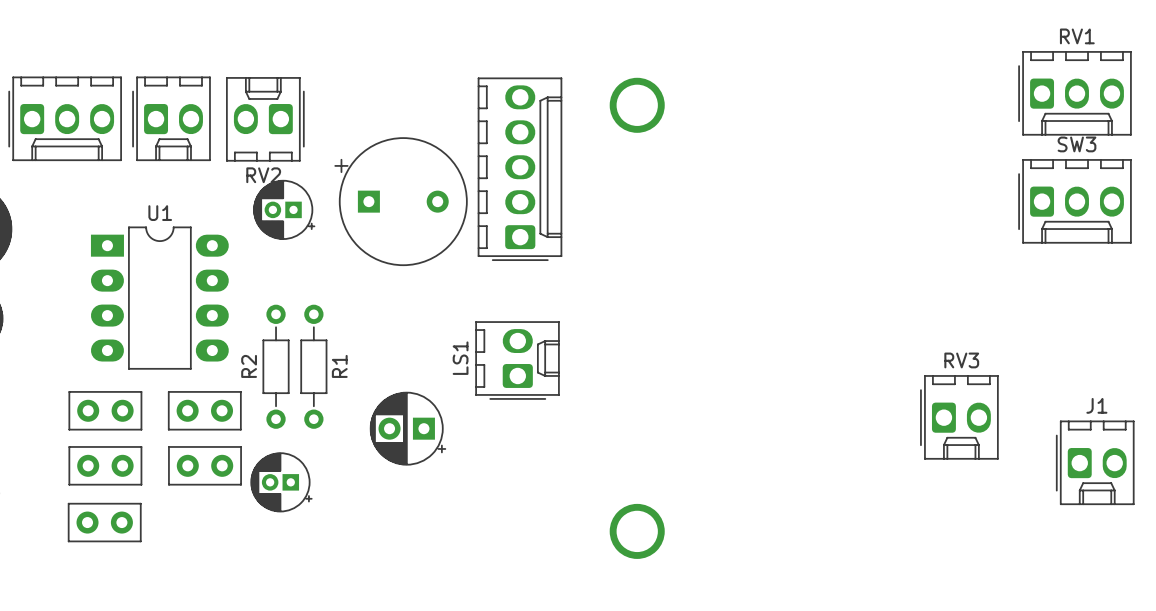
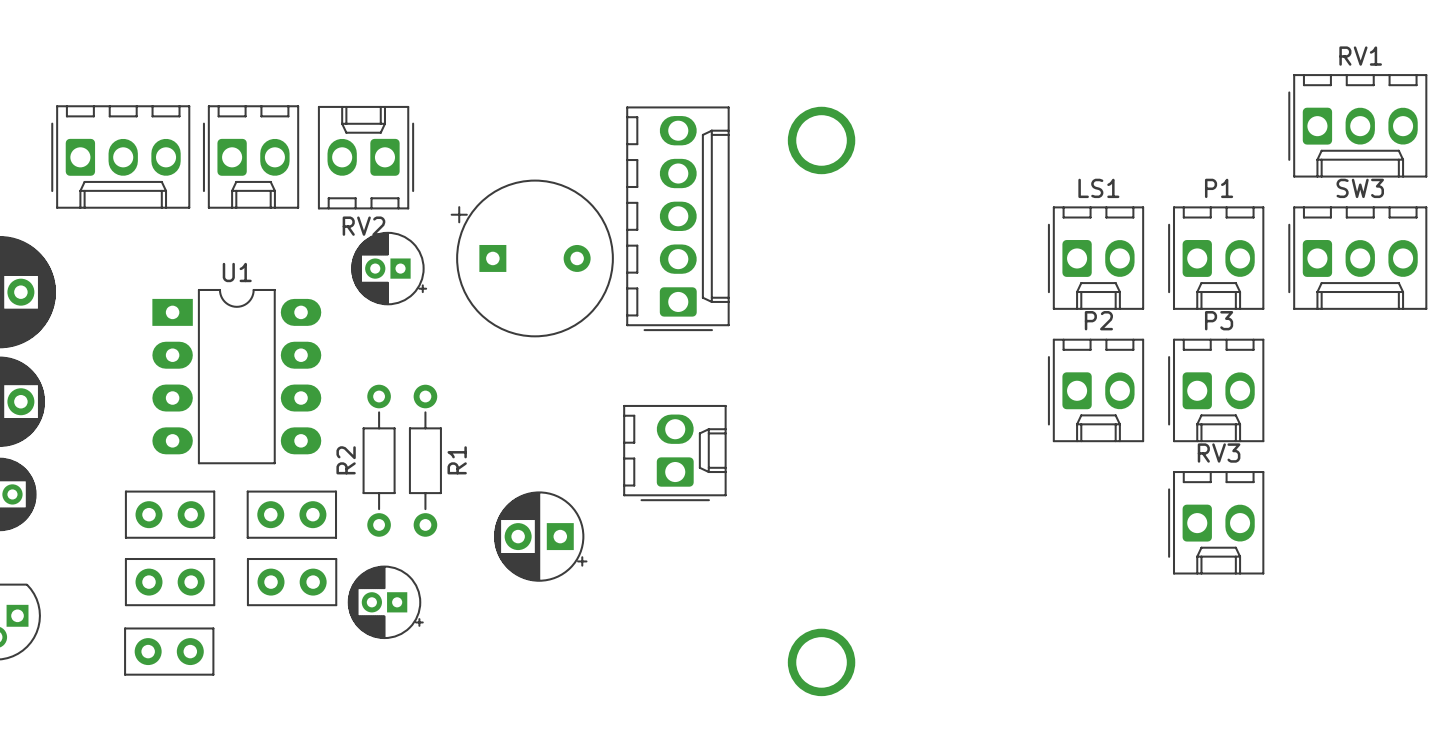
LS1: none -> (1096, 258)
P1: none -> (1216, 258)
P2: none -> (1096, 390)
P3: none -> (1216, 390)
LS1 name: LS1 (460, 358) -> none
J1: (1095, 462) -> none

